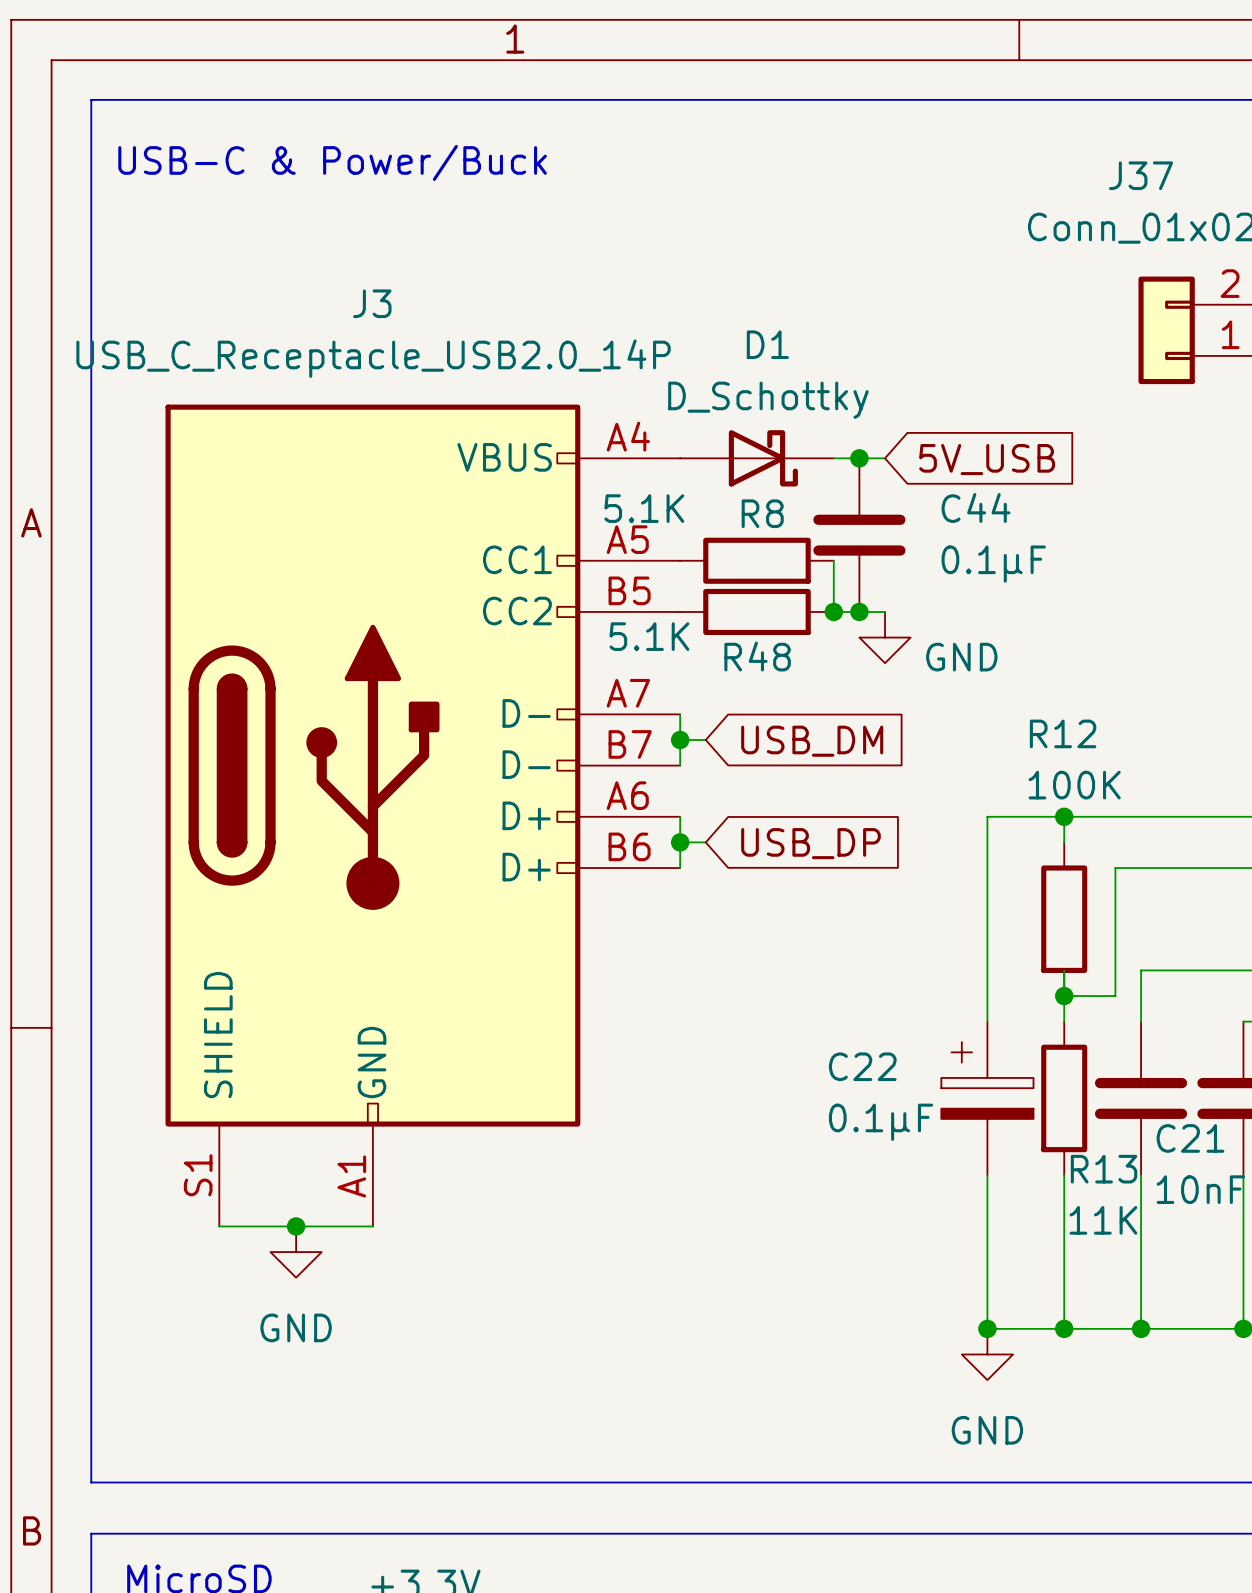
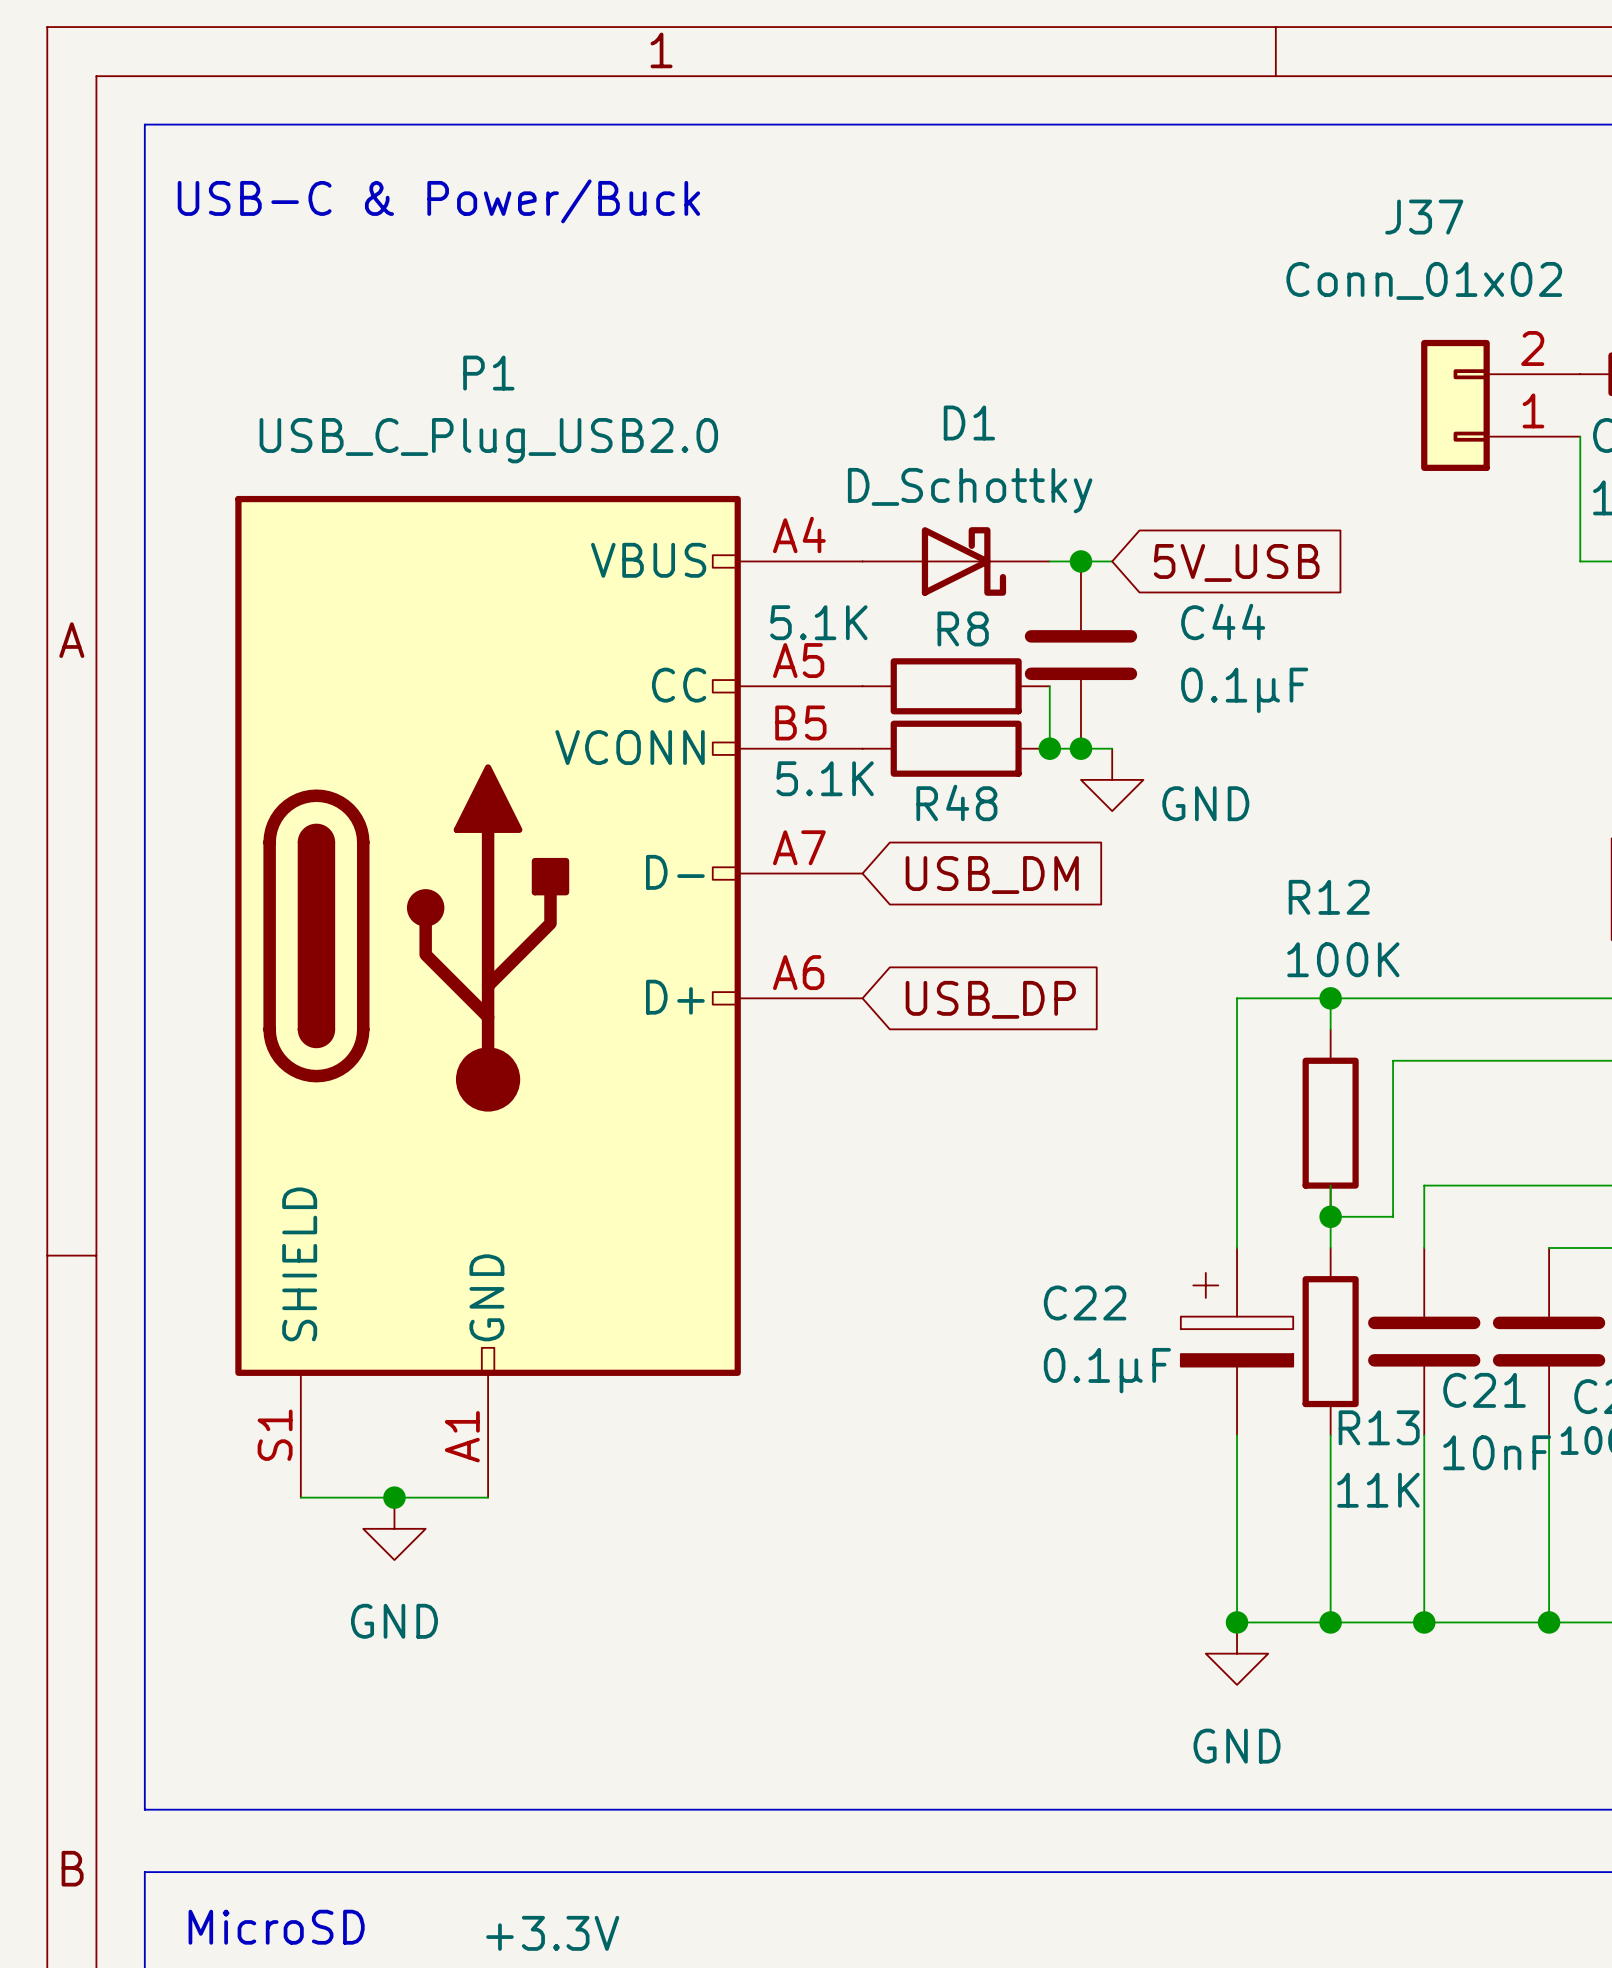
wire: (680, 714) (680, 765) -> none
wire: (680, 739) (705, 739) -> none
junction: (680, 739) -> none
global label position: USB_DM (812, 741) -> USB_DM (992, 875)
J3: USB_C_Receptacle_USB2.0_14P (422, 815) -> none
P1: none -> USB_C_Plug_USB2.0 (548, 996)
wire: (680, 816) (680, 868) -> none
wire: (680, 842) (705, 842) -> none
junction: (680, 842) -> none
global label position: USB_DP (810, 843) -> USB_DP (990, 999)

